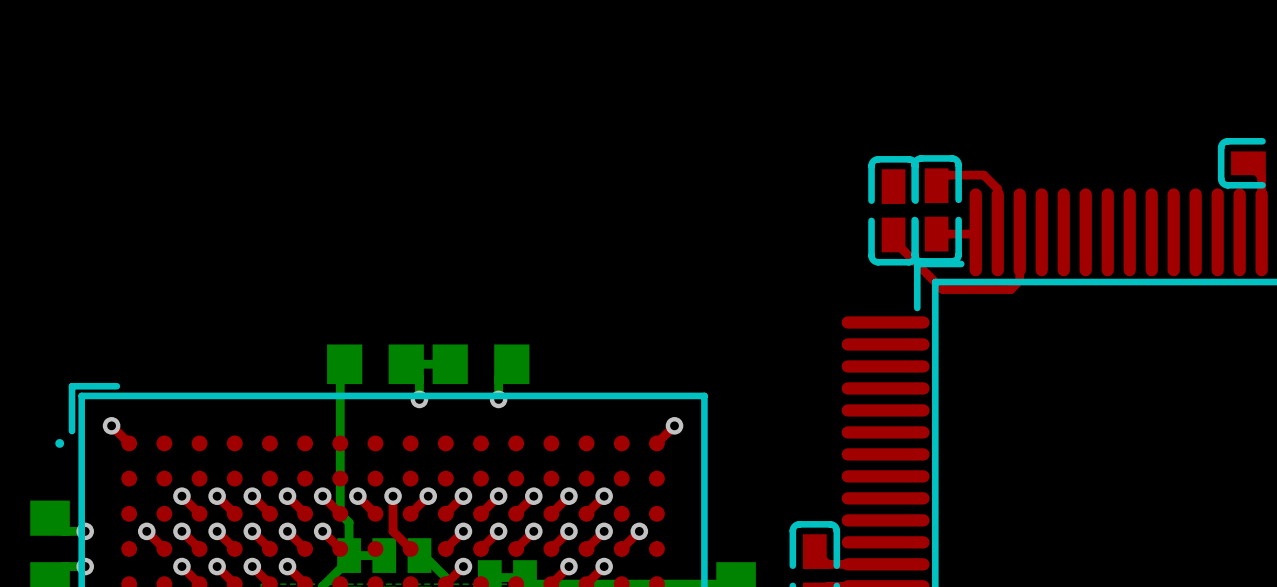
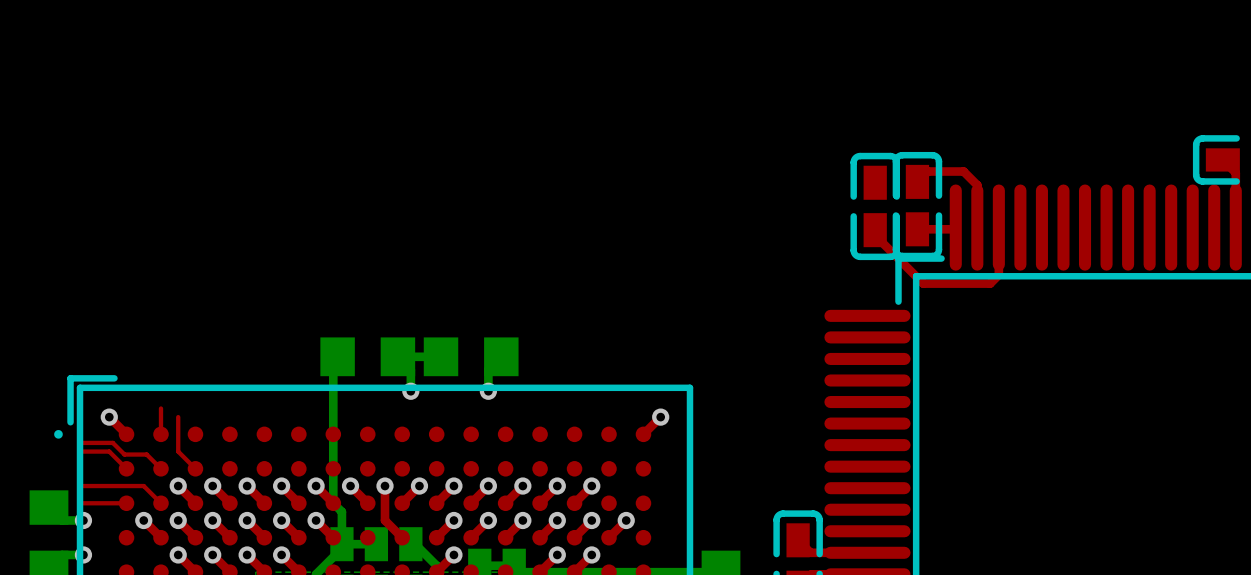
top track: none -> (160, 408) (160, 434)
top track: none -> (178, 417) (178, 451) (195, 468)
top track: none -> (79, 442) (112, 442) (124, 454) (146, 454) (160, 468)
top track: none -> (79, 451) (109, 451) (126, 468)
top track: none -> (83, 486) (143, 486) (160, 503)
top track: none -> (83, 503) (126, 503)

